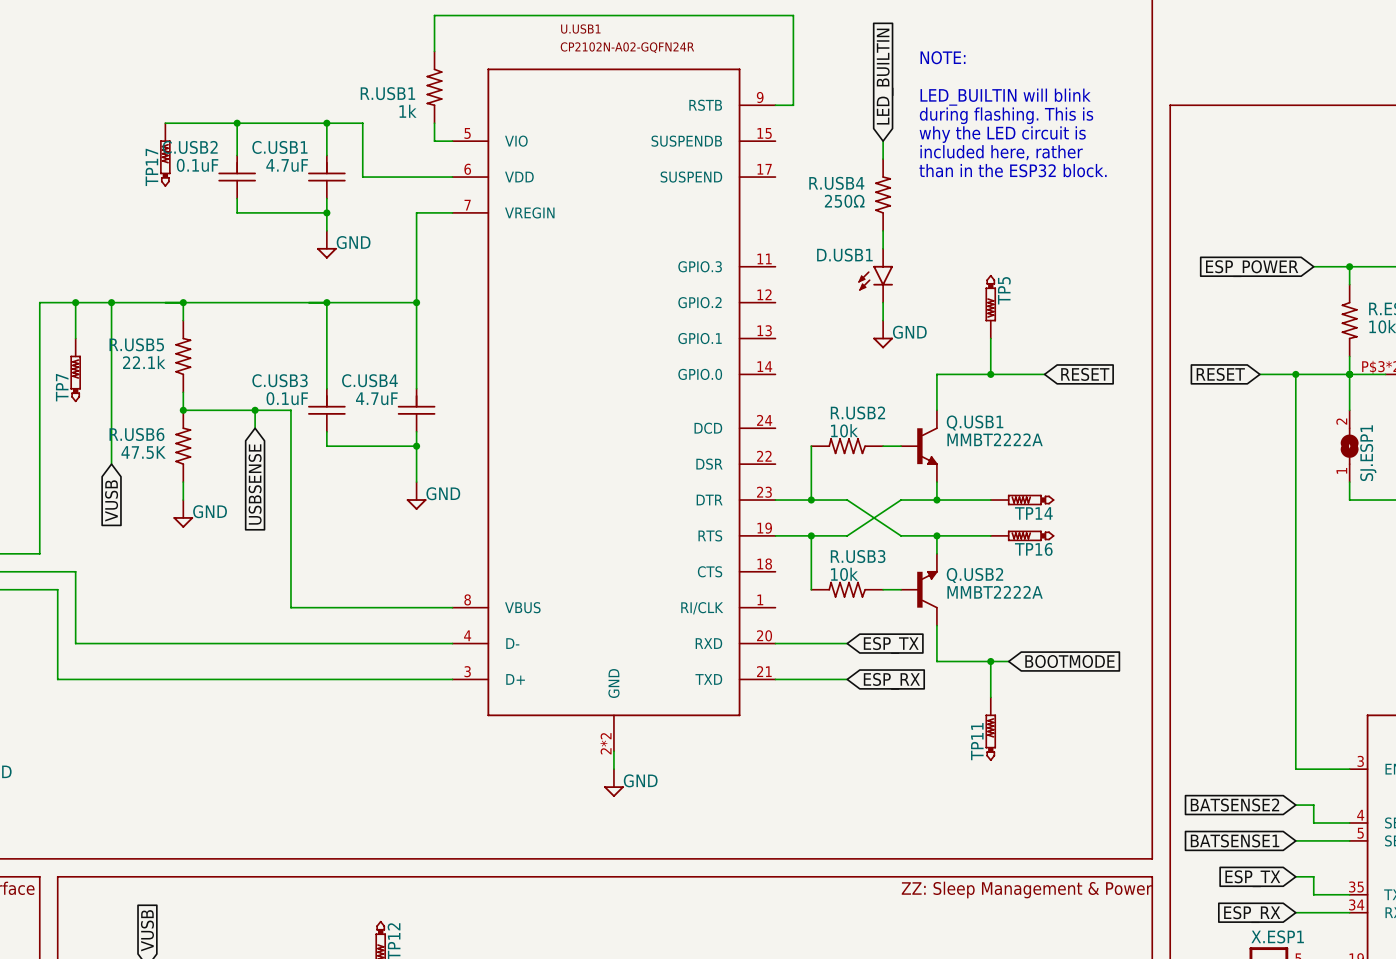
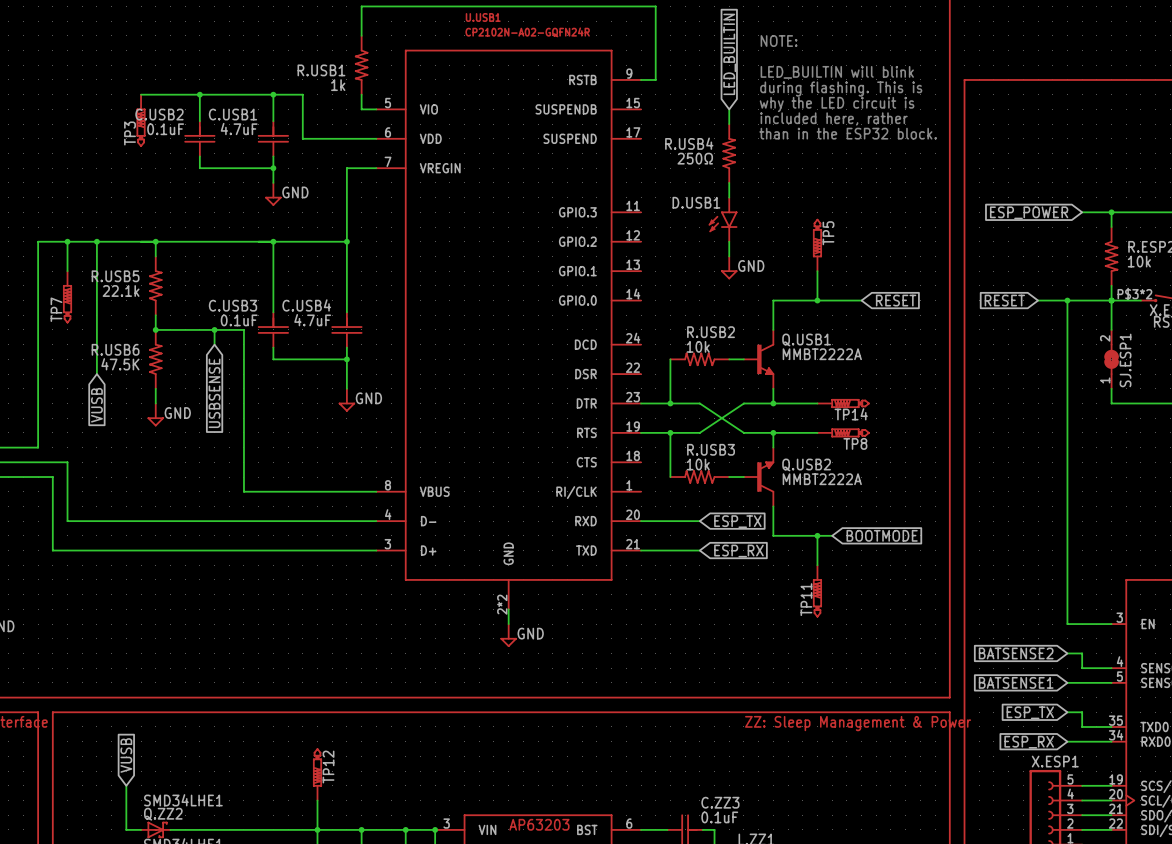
TP17 name: TP17 (151, 167) -> TP3 (130, 133)
TP16 name: TP16 (1033, 549) -> TP8 (855, 443)

